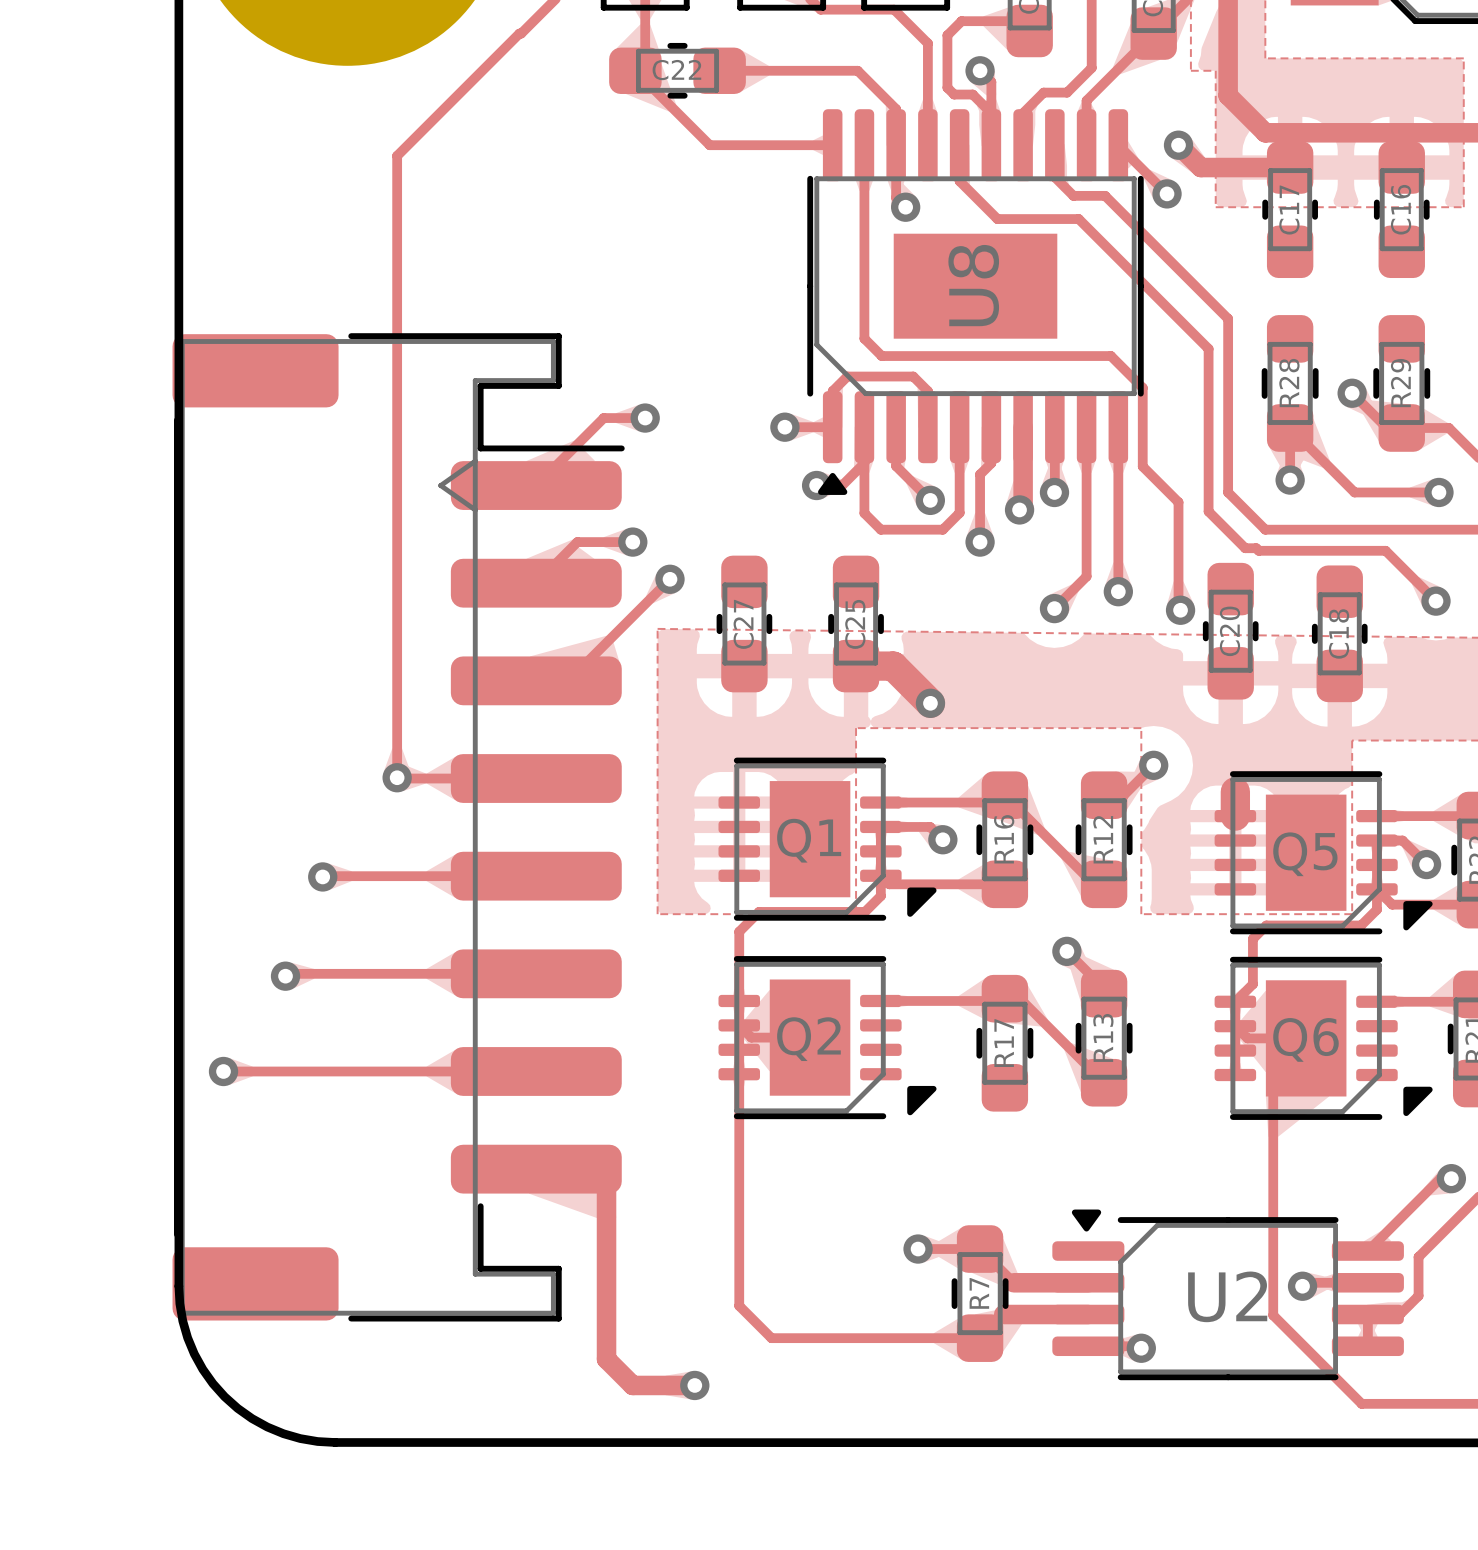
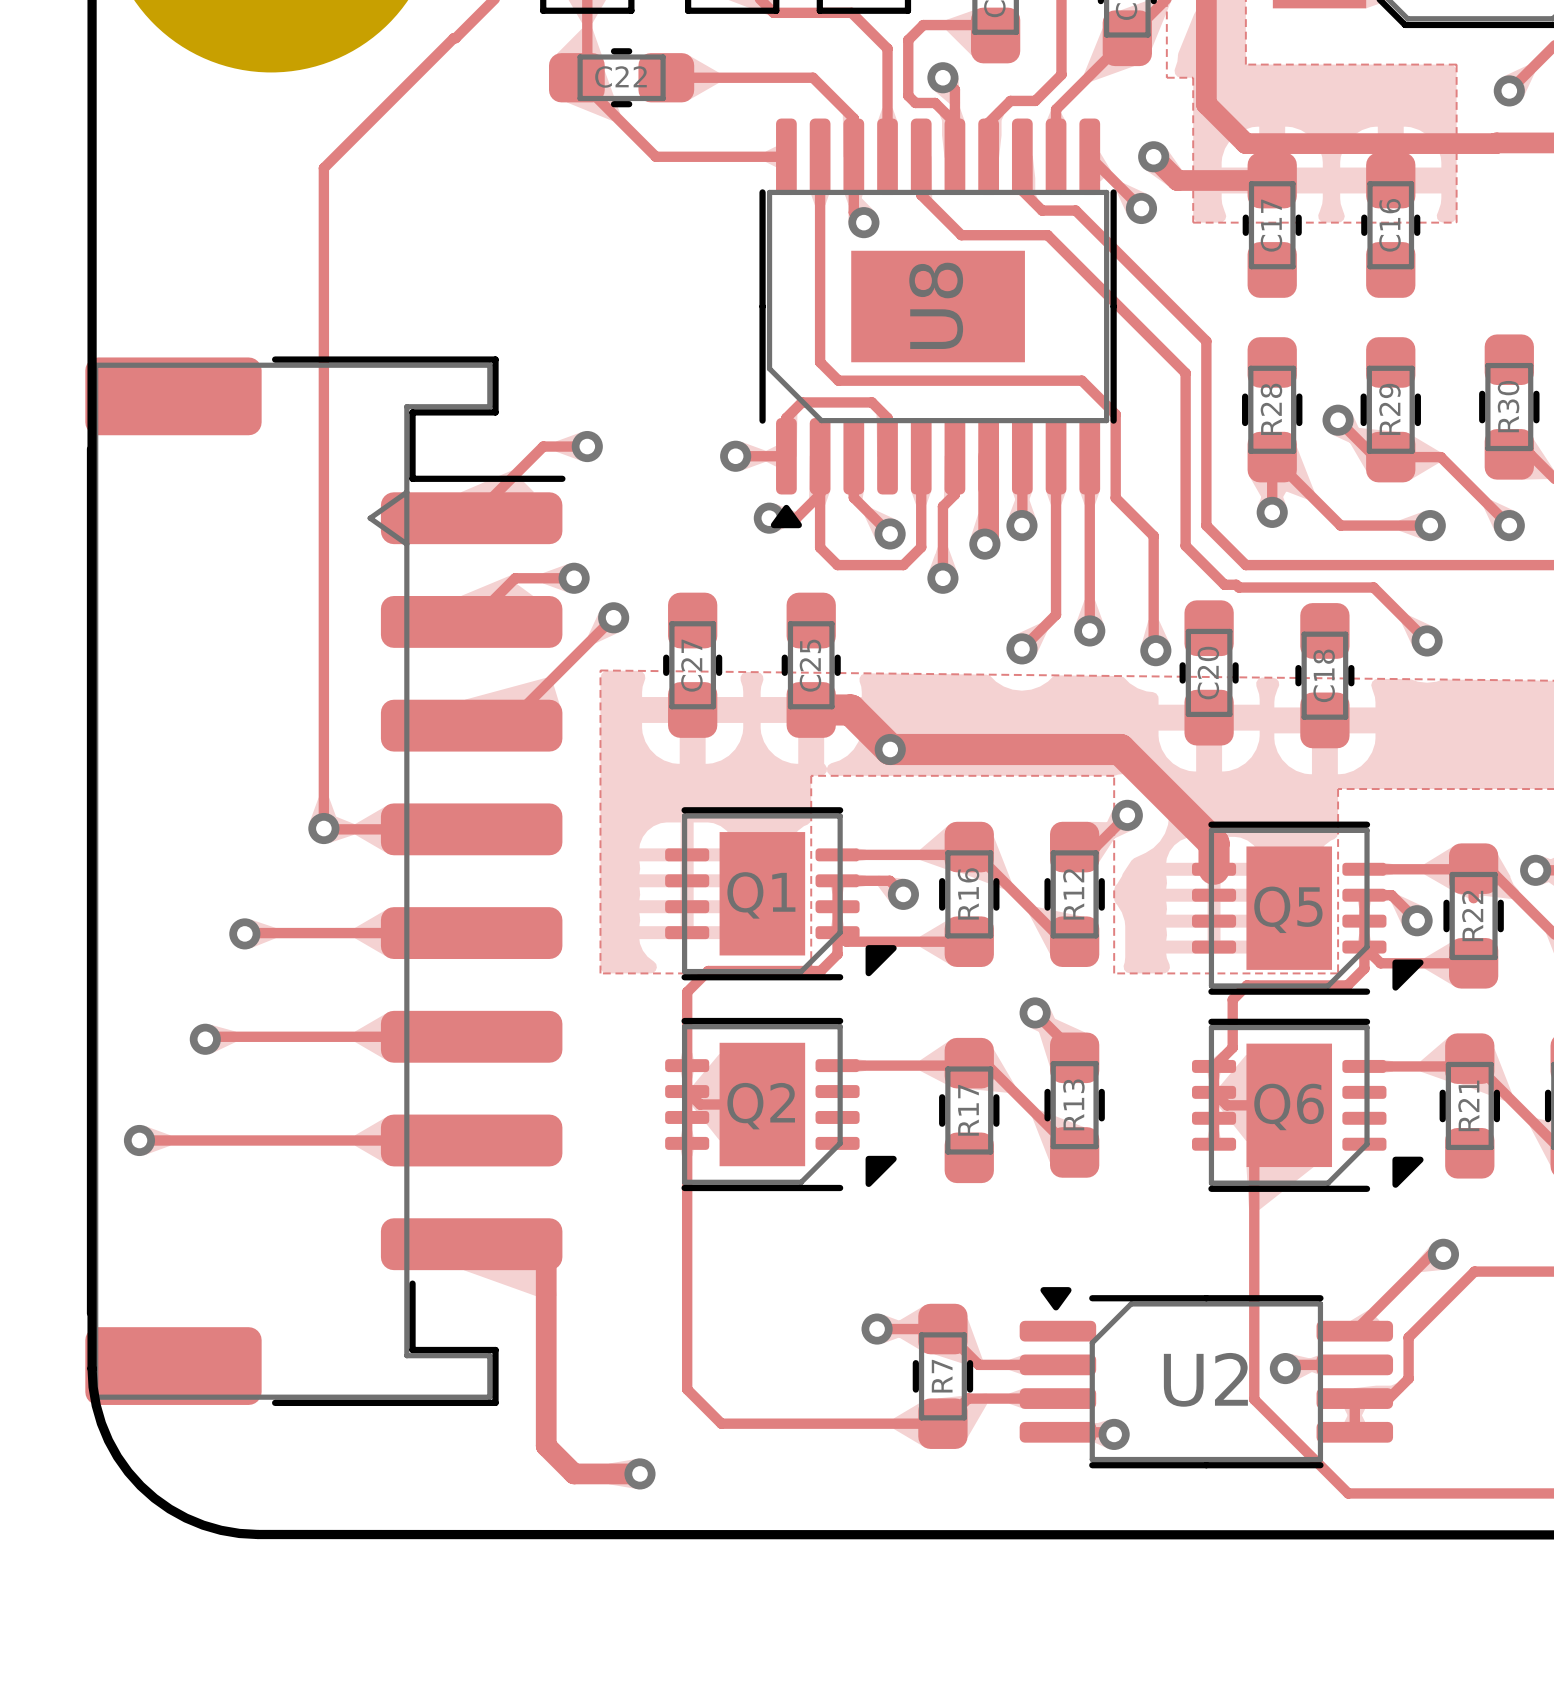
track: none -> (890, 749) (1120, 749) (1214, 843)
track width: thick (1013, 1282) (1088, 1282) -> thin (978, 1364) (1057, 1364)
track width: thick (1003, 1314) (1088, 1314) -> thin (968, 1398) (1057, 1398)

